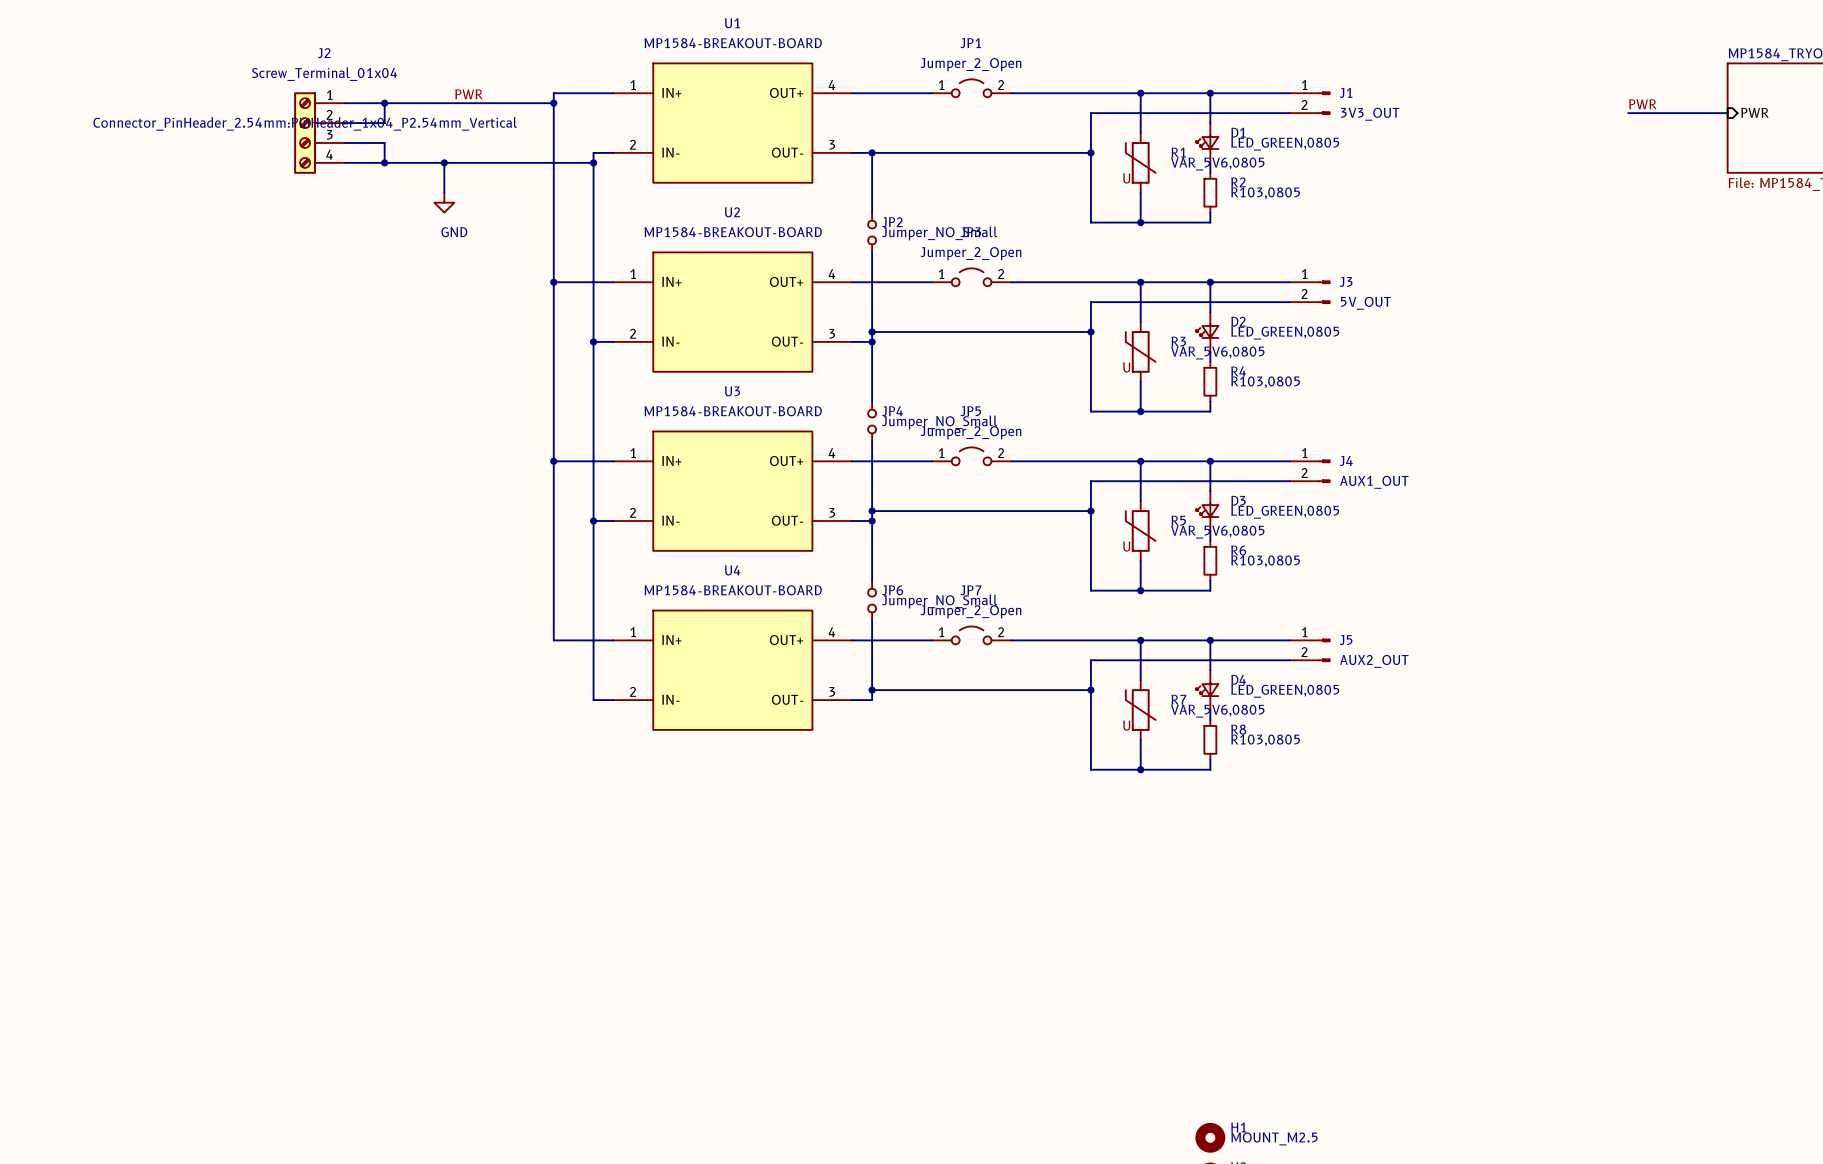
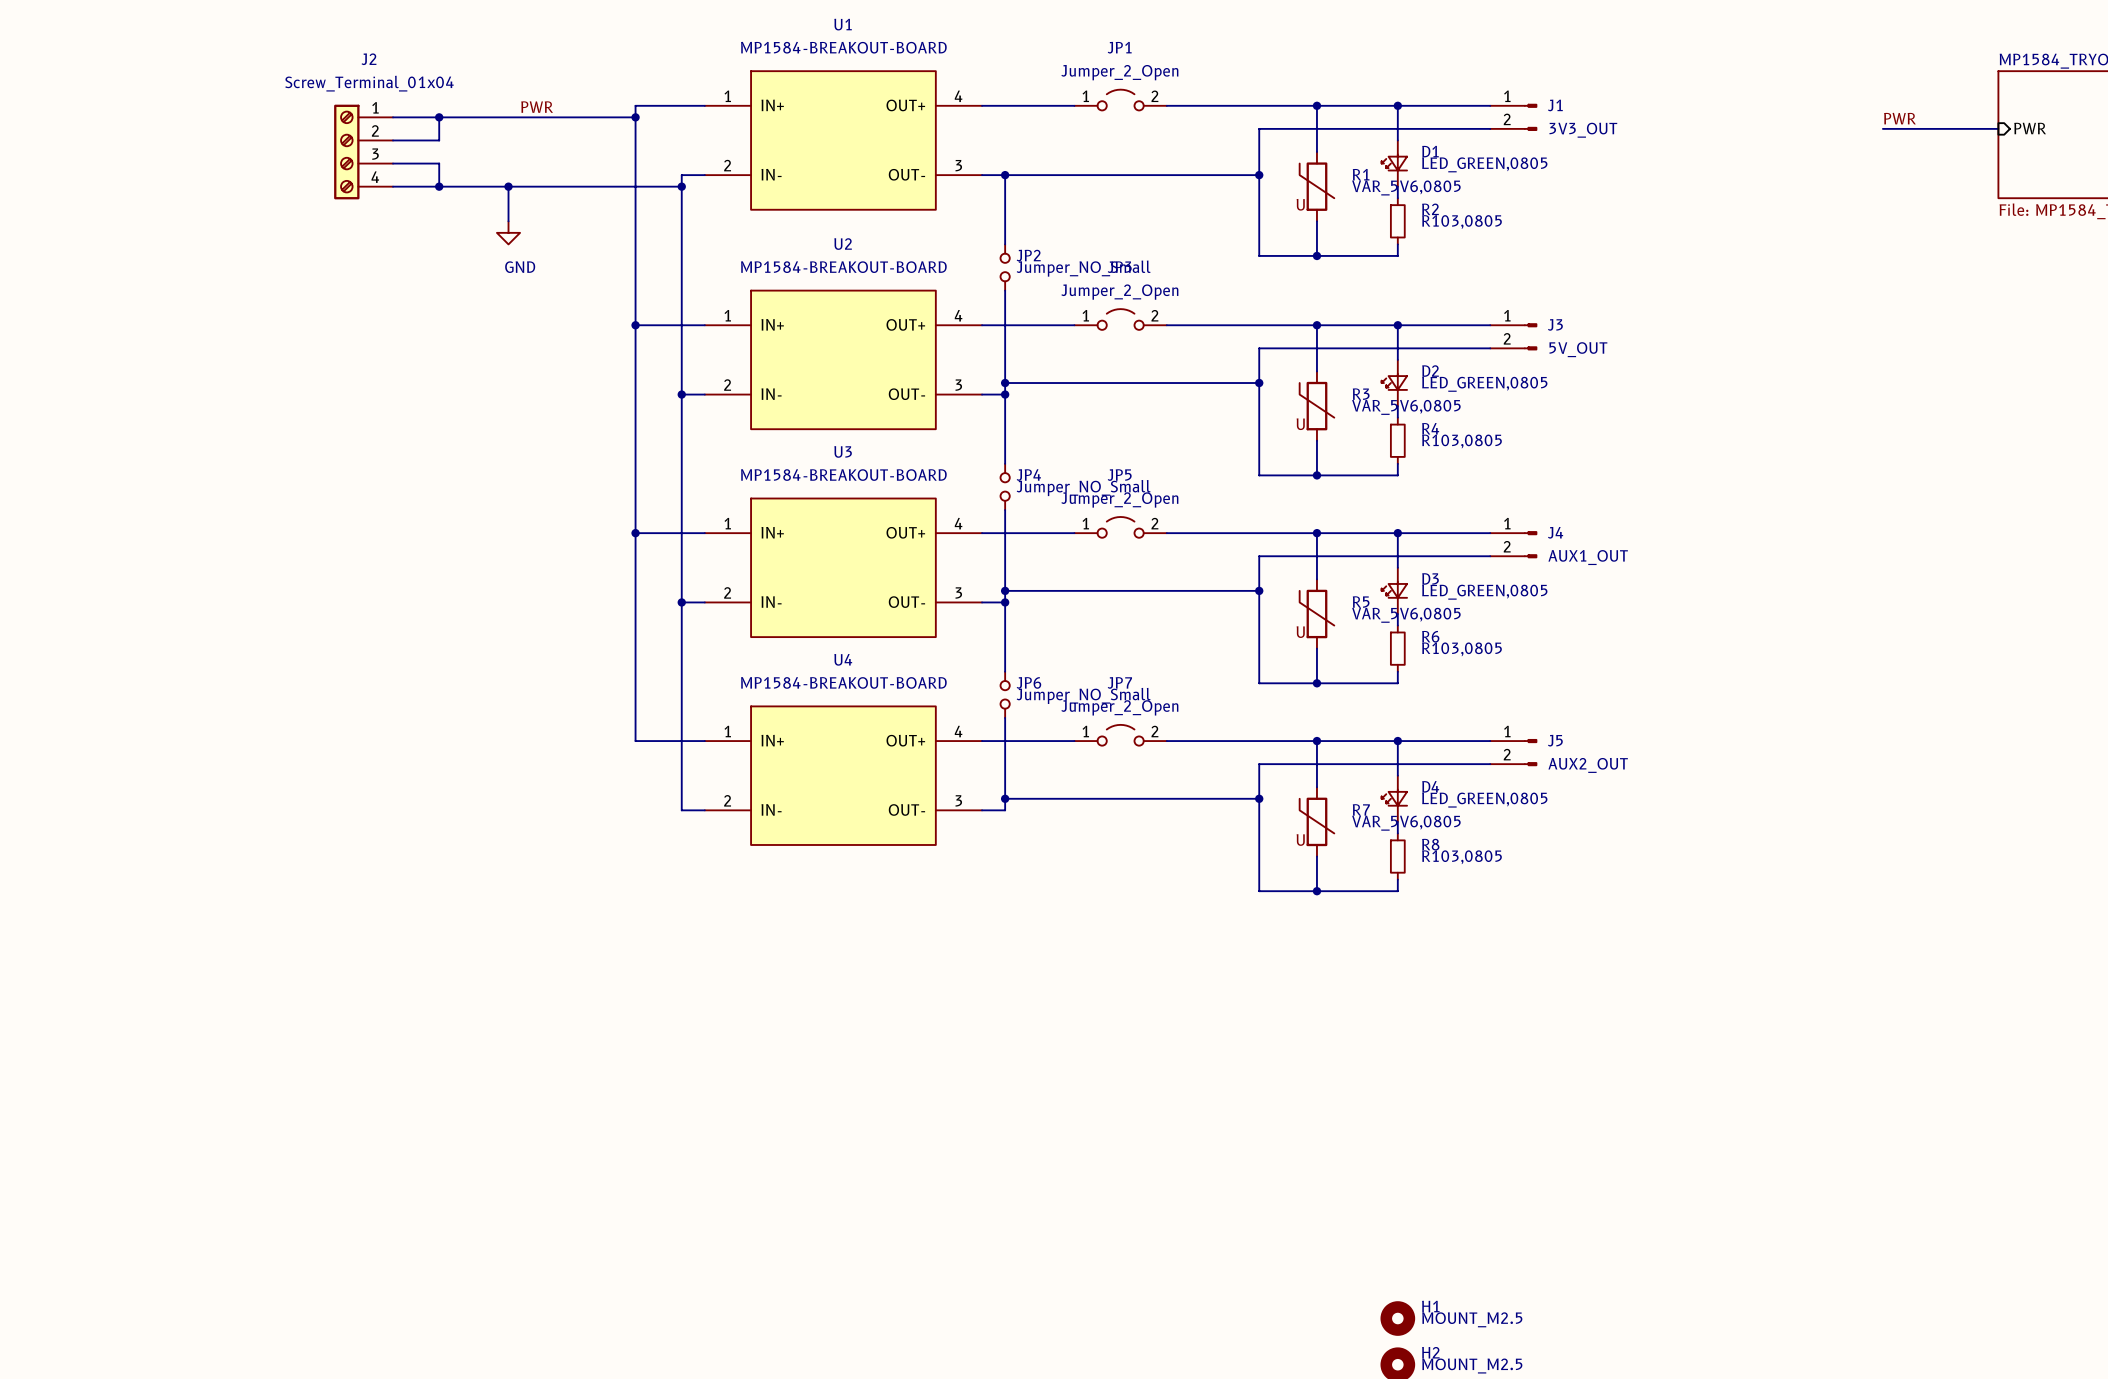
J2 text: Connector_PinHeader_2.54mm:PinHeader_1x04_P2.54mm_Vertical (305, 123) -> none

